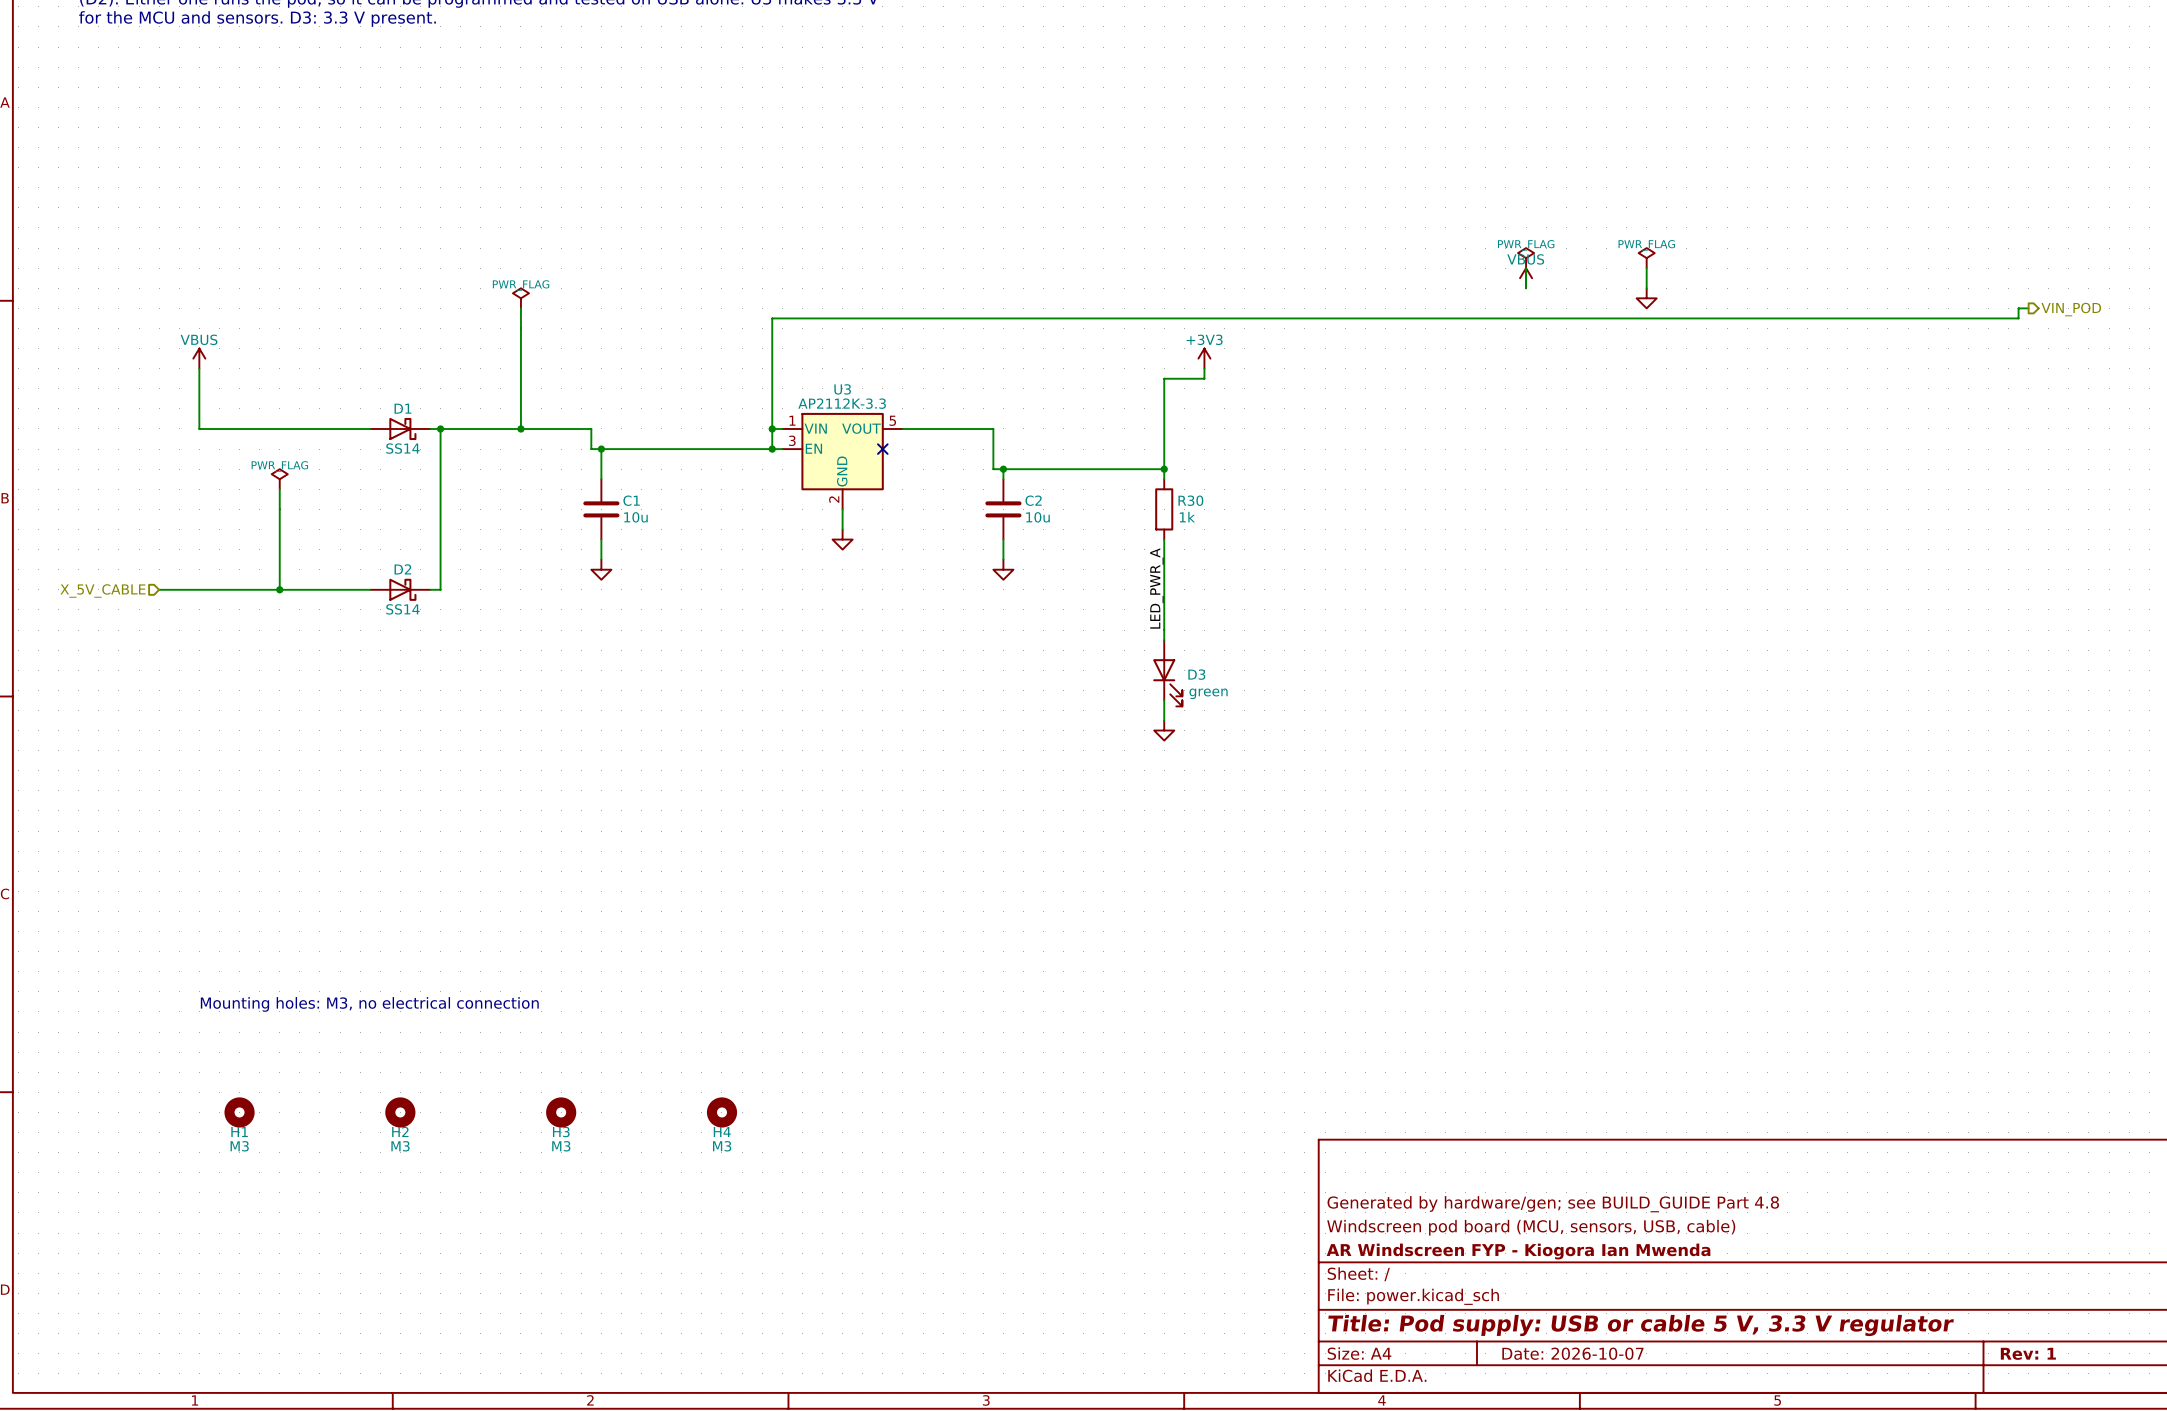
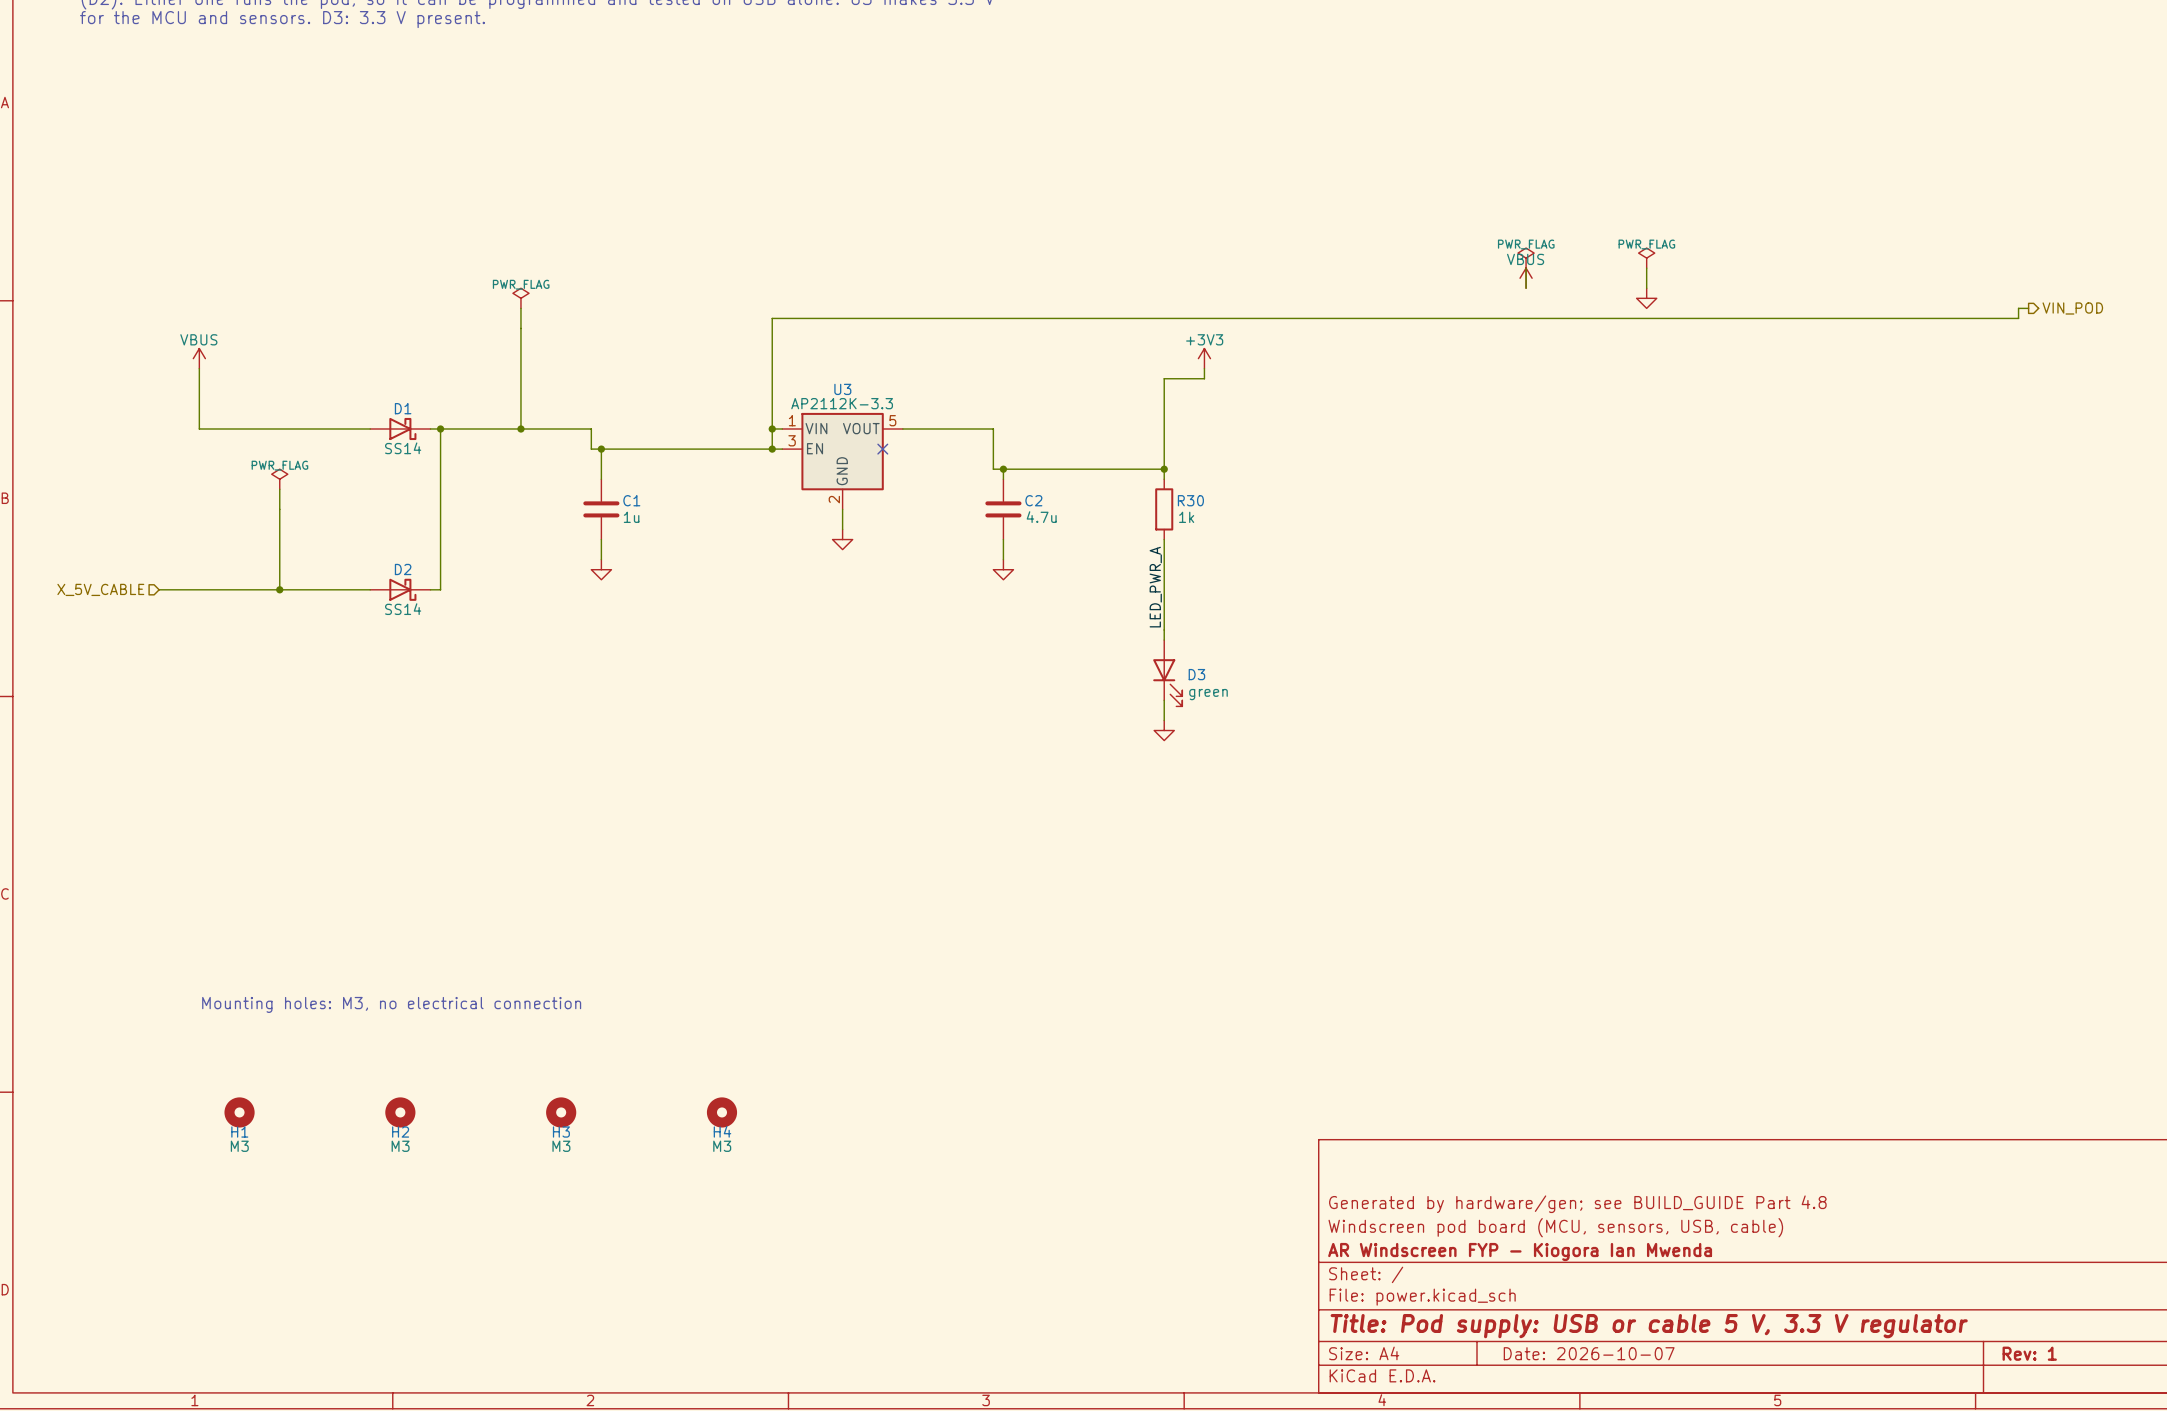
C1 value: 10u (635, 517) -> 1u (631, 517)
C2 value: 10u (1038, 517) -> 4.7u (1041, 517)

